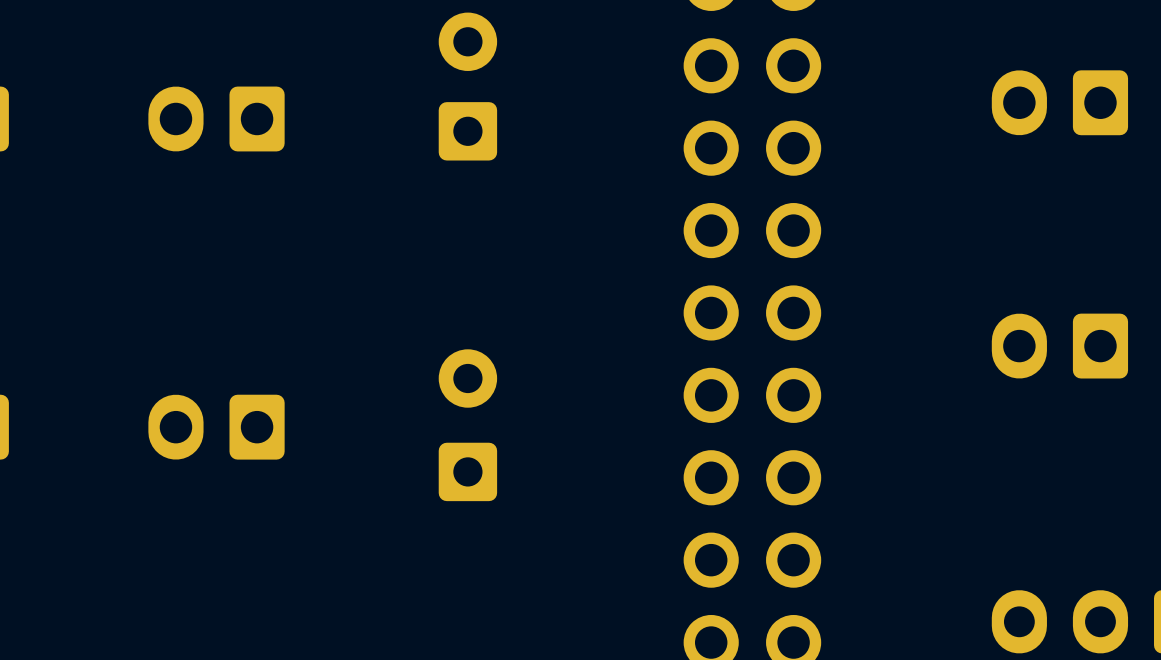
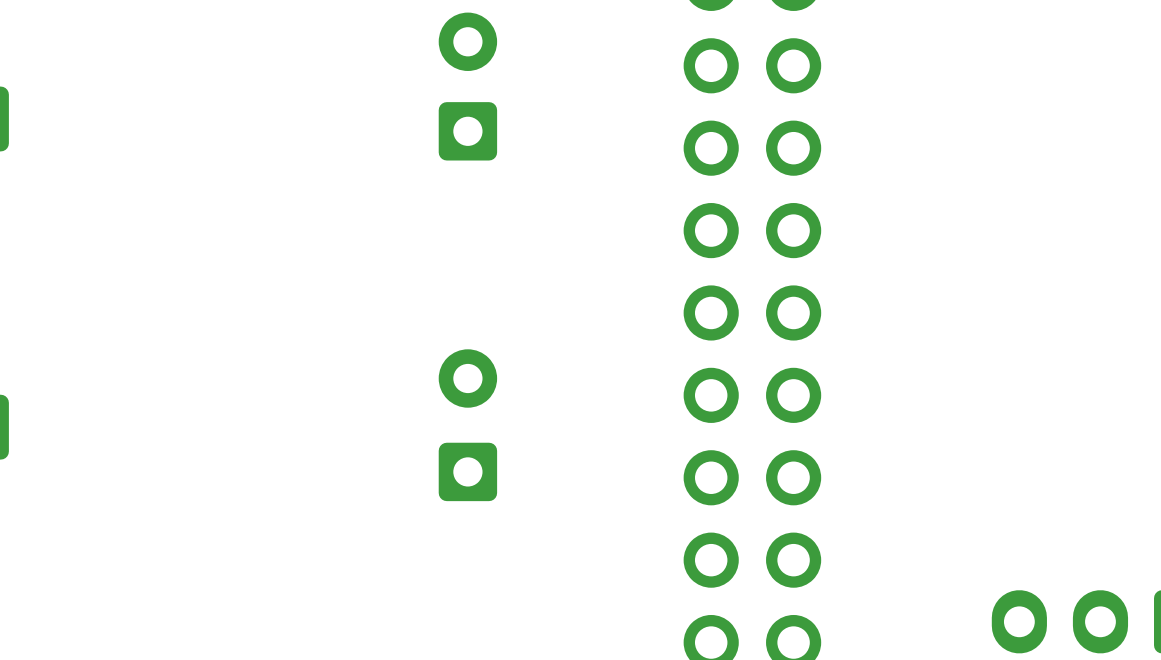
part: (1059, 102) -> none
part: (216, 118) -> none
part: (1059, 346) -> none
part: (216, 427) -> none

